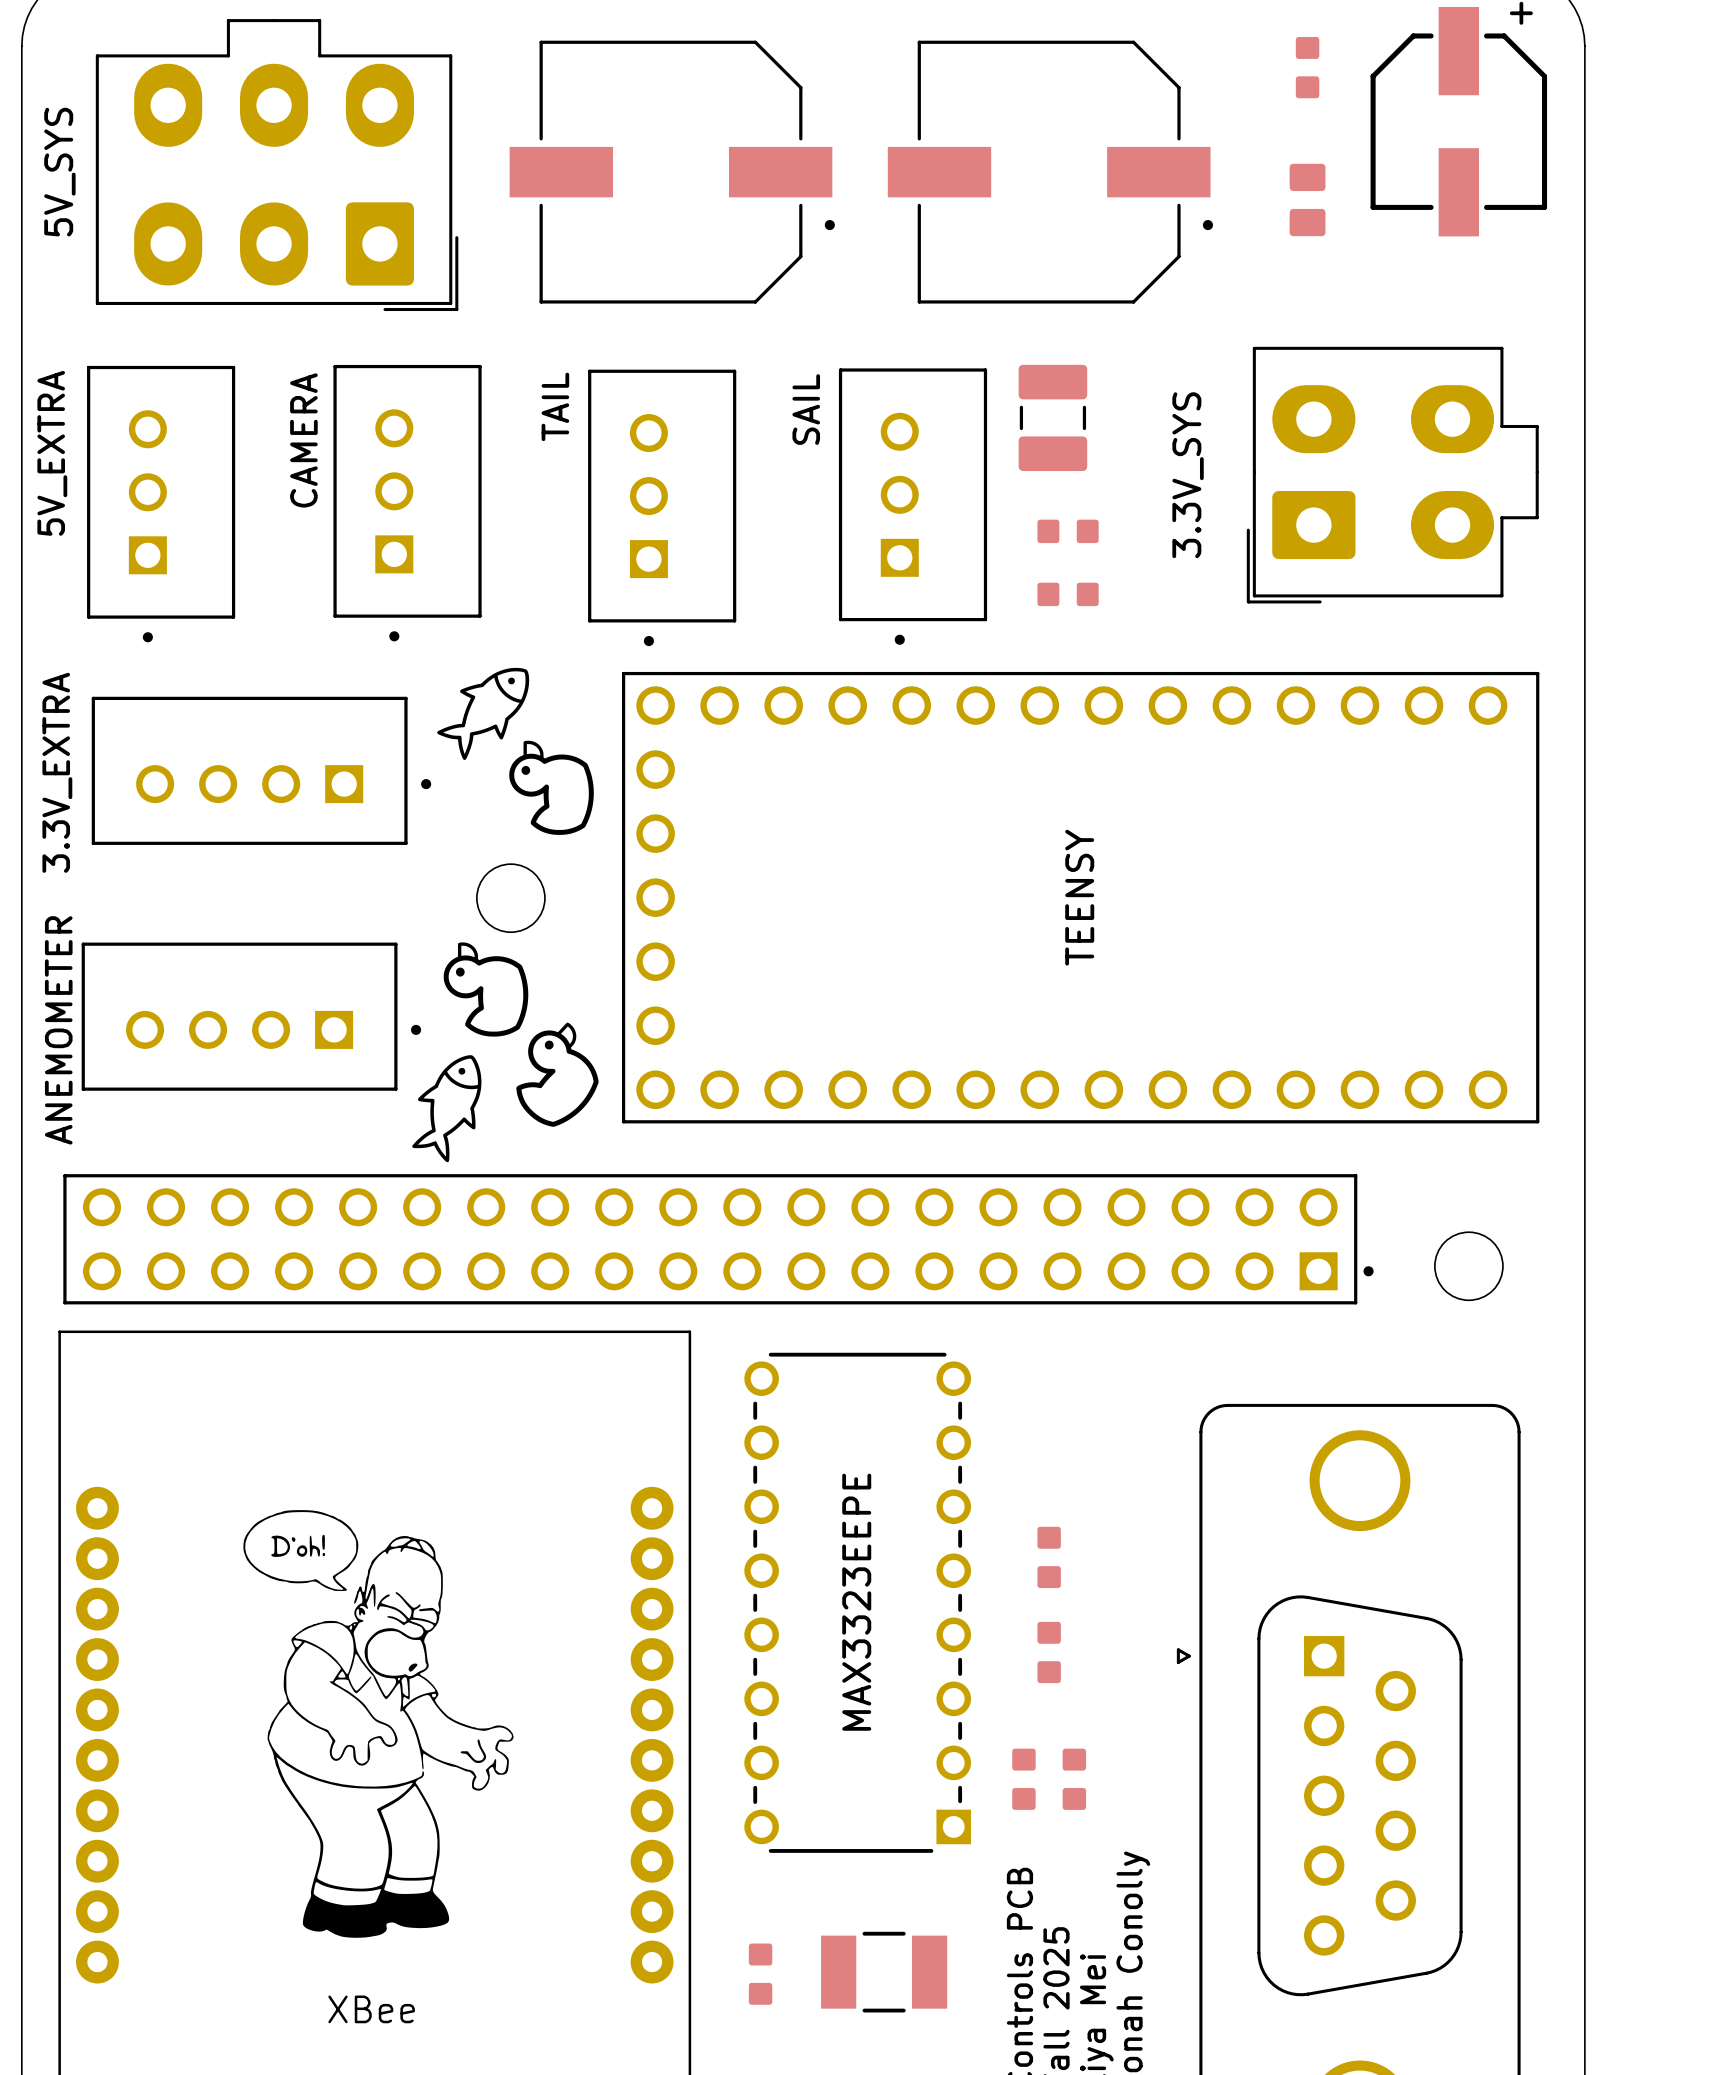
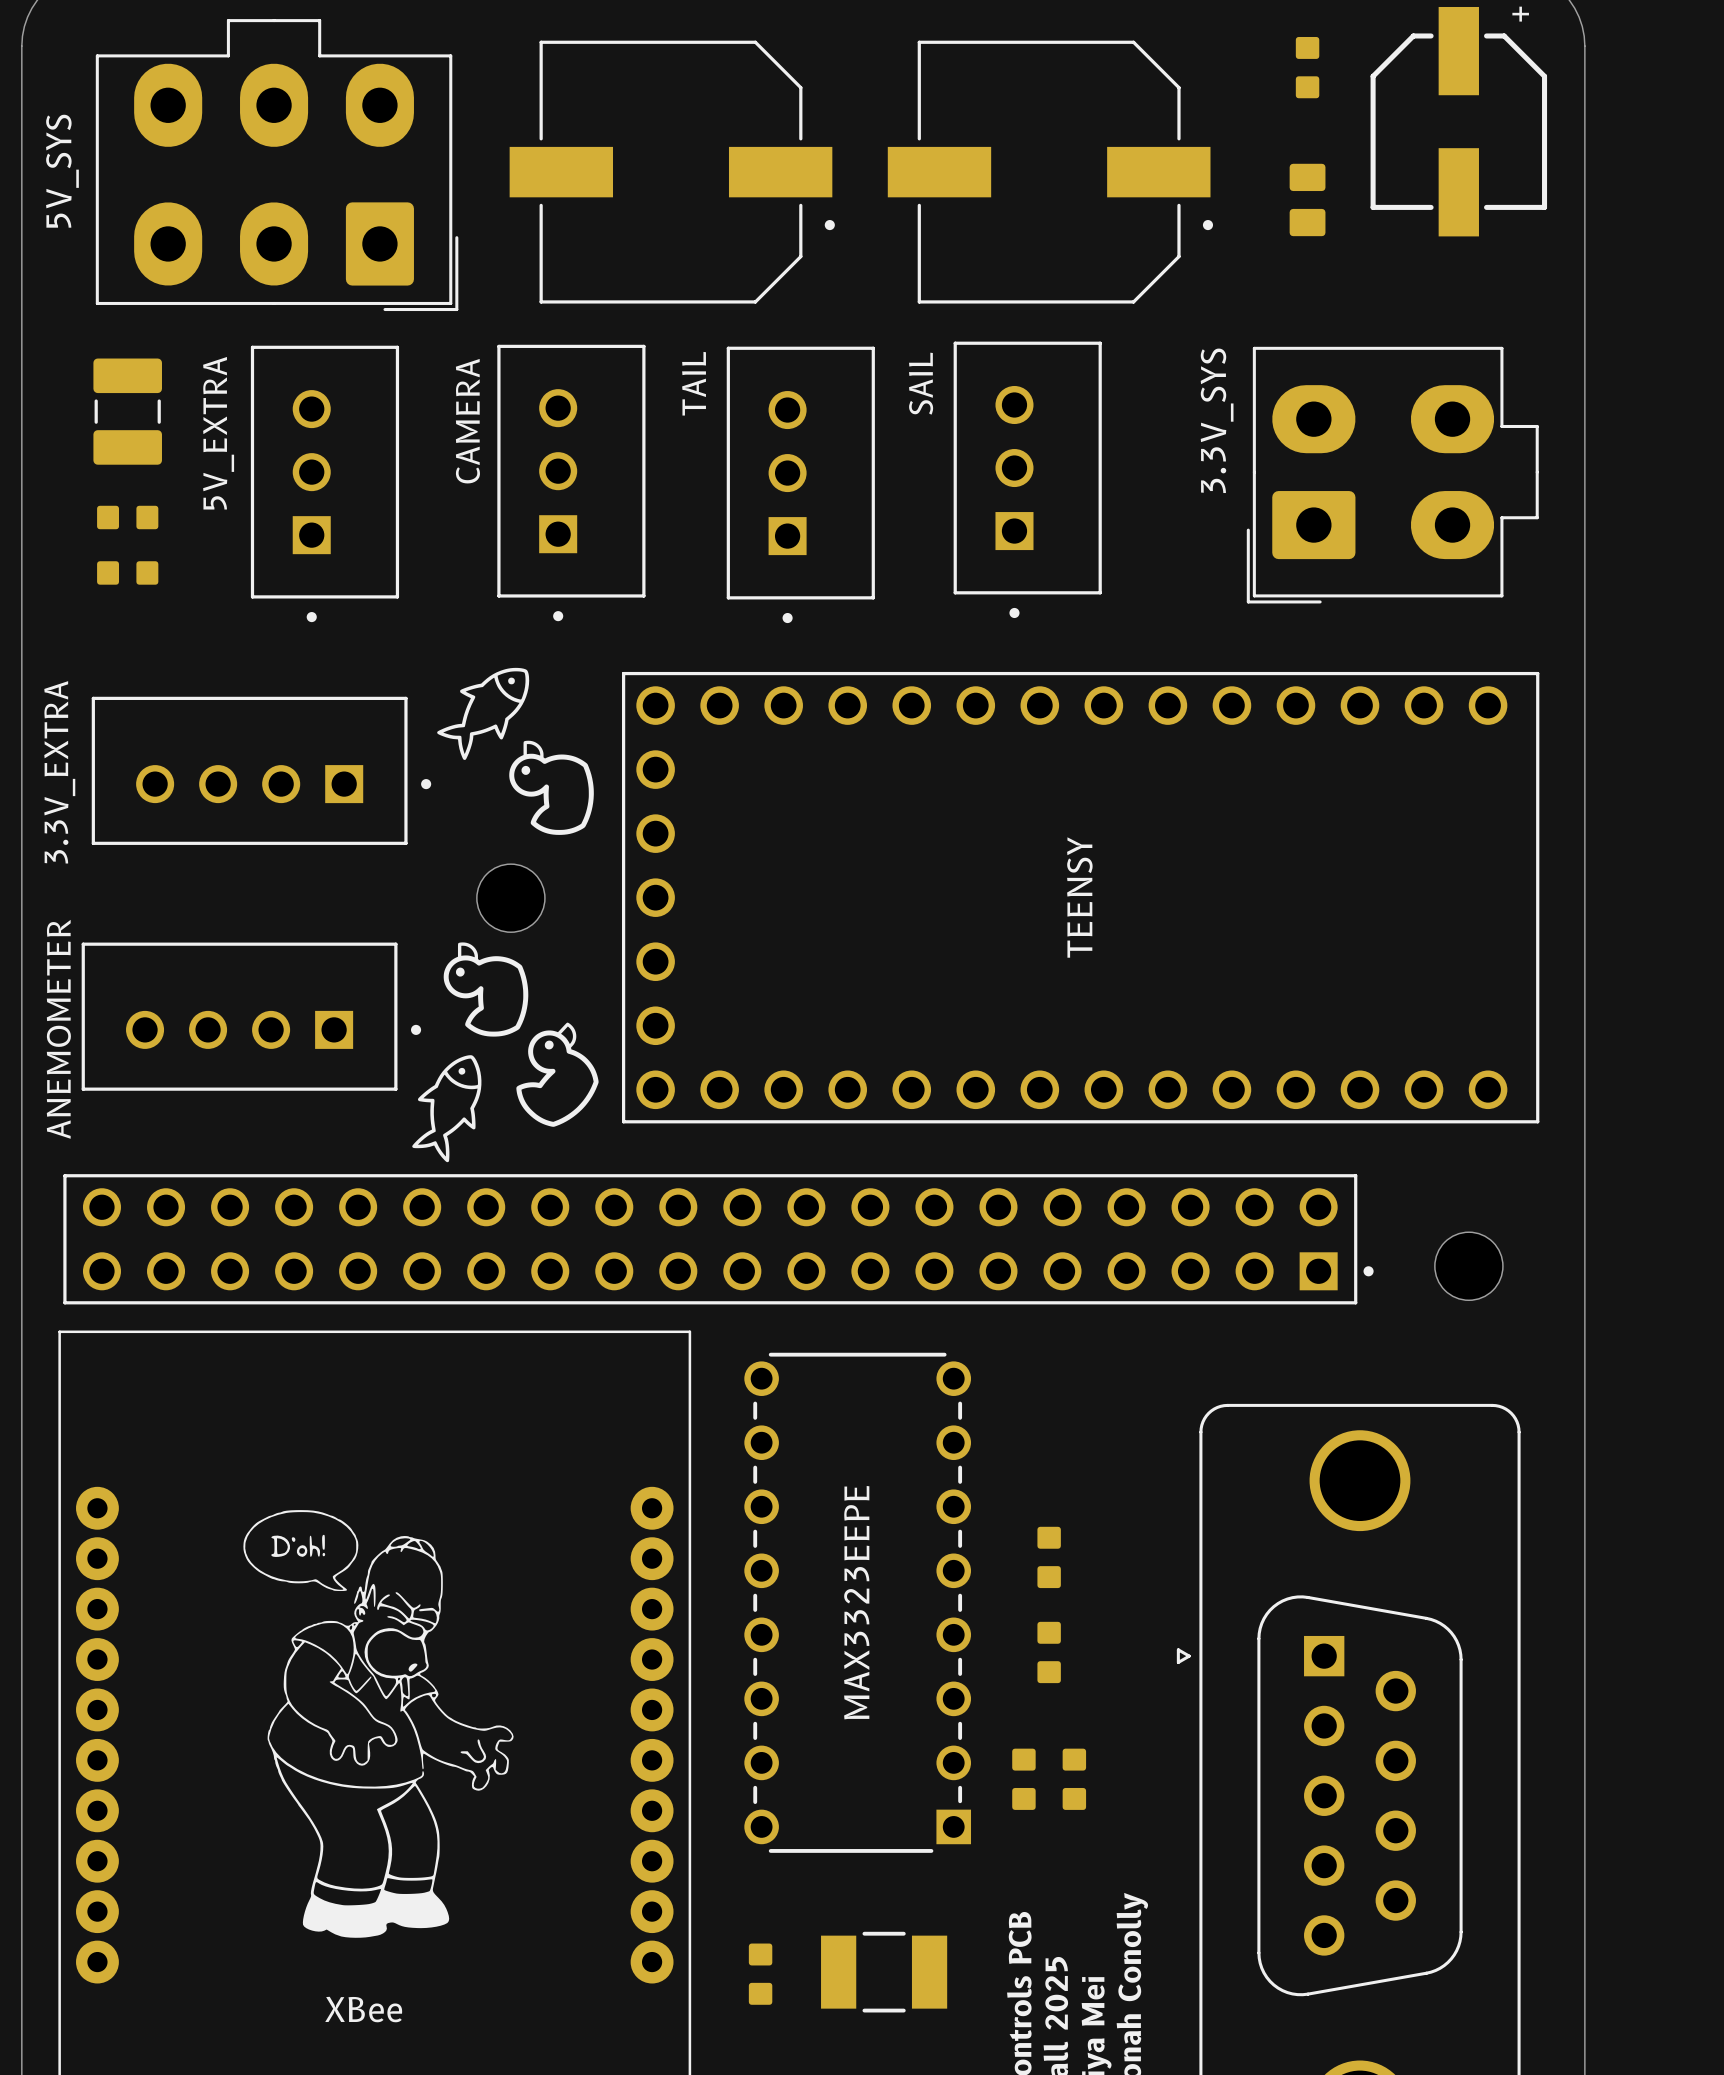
part: none -> (127, 411)
part: (1052, 417) -> none
3.3V_SYS name position: 3.3V_SYS (1188, 475) -> 3.3V_SYS (1217, 420)
CAMERA position: (407, 503) -> (571, 482)
5V_EXTRA position: (161, 504) -> (324, 483)
SAIL position: (913, 506) -> (1027, 479)
TAIL position: (662, 507) -> (800, 484)
part: none -> (127, 517)
part: (1068, 531) -> none
part: none -> (127, 572)
part: (1068, 594) -> none

